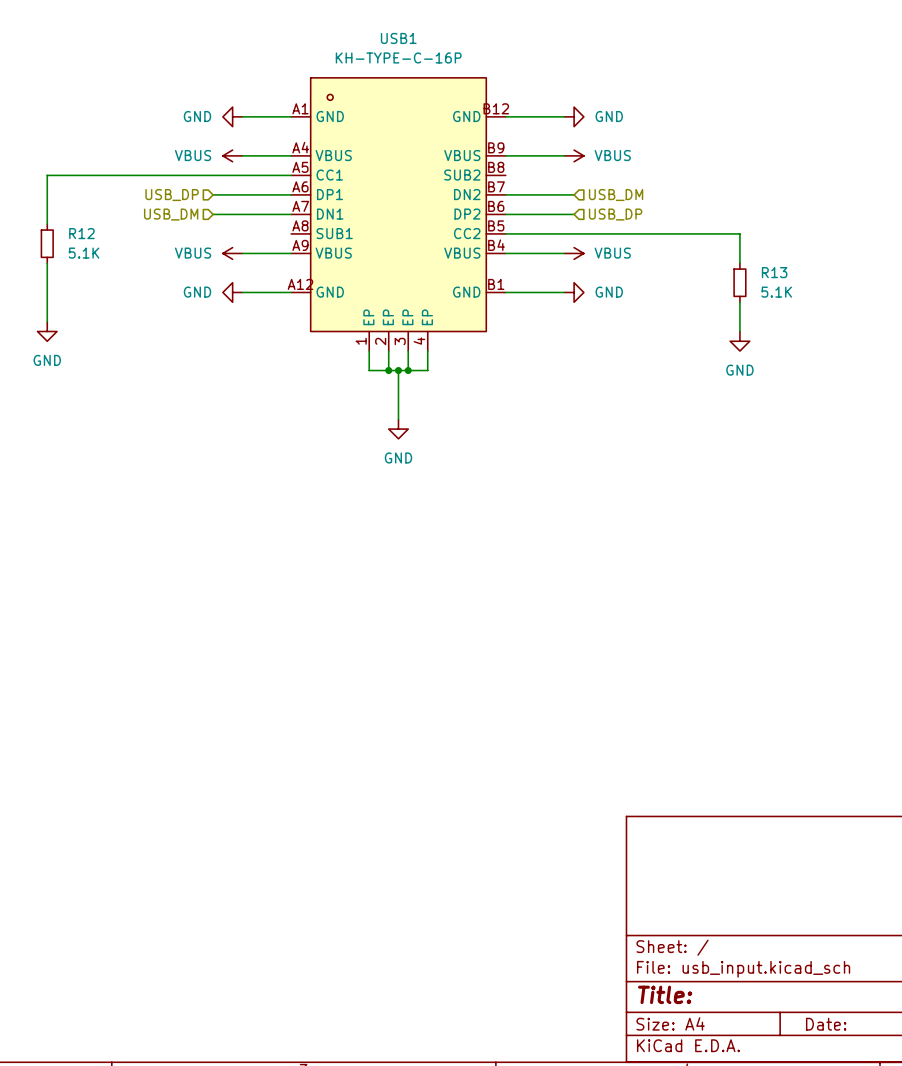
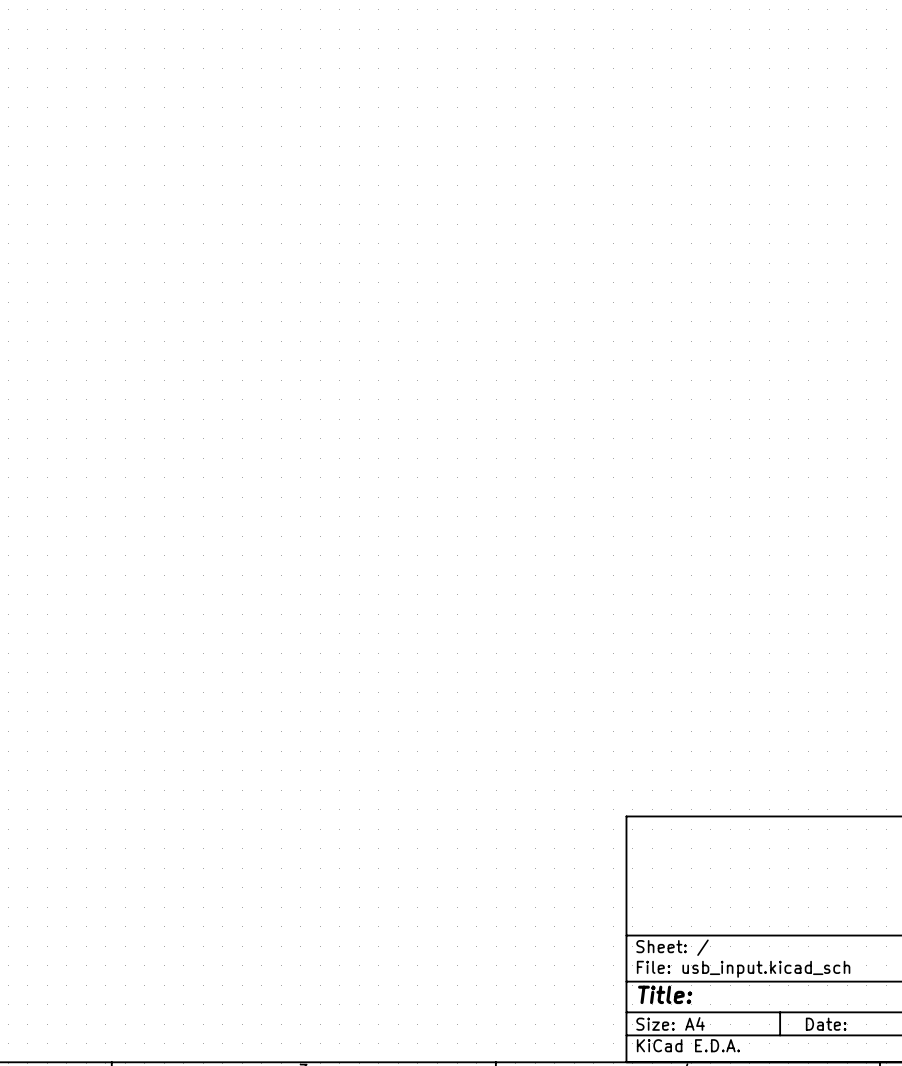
power symbol: GND (232, 116) -> none
wire: (242, 116) (291, 116) -> none
wire: (505, 116) (564, 116) -> none
power symbol: GND (574, 116) -> none
power symbol: VBUS (232, 155) -> none
wire: (242, 155) (291, 155) -> none
wire: (505, 155) (564, 155) -> none
power symbol: VBUS (574, 155) -> none
wire: (291, 175) (47, 175) (47, 224) -> none
wire: (213, 194) (291, 194) -> none
wire: (505, 194) (574, 194) -> none
hierarchical label: USB_DP (172, 195) -> none
hierarchical label: USB_DM (616, 195) -> none
hierarchical label: USB_DM (171, 214) -> none
wire: (213, 214) (291, 214) -> none
USB1: KH-TYPE-C-16P (398, 214) -> none
wire: (505, 214) (574, 214) -> none
hierarchical label: USB_DP (615, 214) -> none
wire: (505, 233) (739, 233) (739, 263) -> none
R12: 5.1K (47, 243) -> none
power symbol: VBUS (232, 253) -> none
wire: (242, 253) (291, 253) -> none
wire: (505, 253) (564, 253) -> none
power symbol: VBUS (574, 253) -> none
wire: (47, 263) (47, 321) -> none
R13: 5.1K (739, 282) -> none
power symbol: GND (232, 292) -> none
wire: (242, 292) (291, 292) -> none
wire: (505, 292) (564, 292) -> none
power symbol: GND (574, 292) -> none
wire: (739, 302) (739, 331) -> none
power symbol: GND (47, 331) -> none
power symbol: GND (739, 341) -> none
wire: (369, 351) (369, 370) (427, 370) (427, 351) -> none
wire: (388, 351) (388, 370) -> none
wire: (408, 351) (408, 370) -> none
junction: (388, 370) -> none
wire: (398, 370) (398, 419) -> none
junction: (398, 370) -> none
junction: (408, 370) -> none
power symbol: GND (398, 429) -> none

